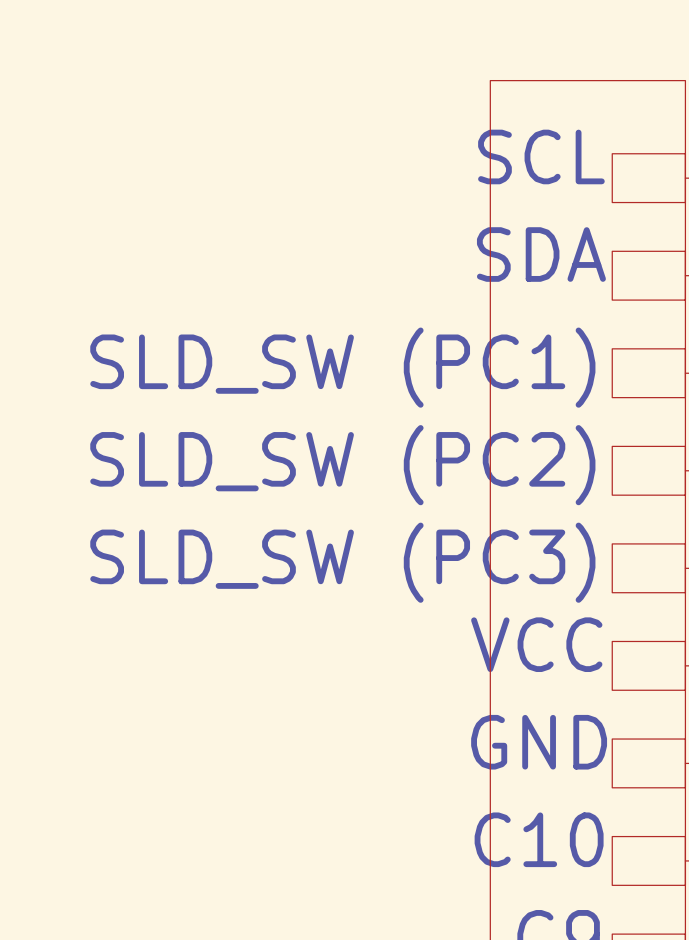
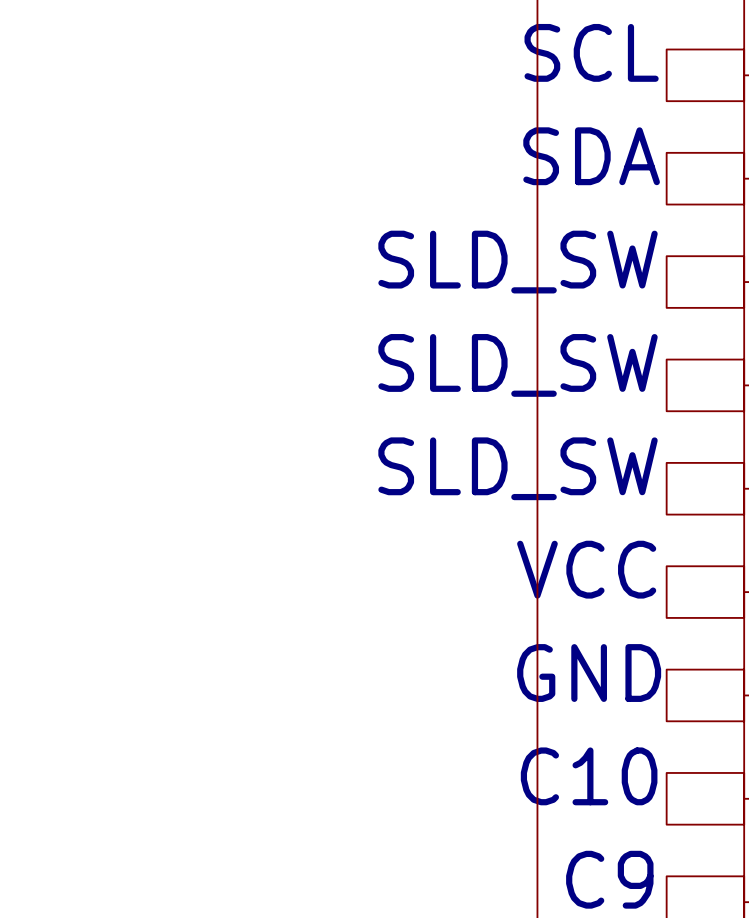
text: none -> SLD_SW (518, 262)
text: SLD_SW (PC1) (342, 367) -> none
text: none -> SLD_SW (518, 365)
text: SLD_SW (PC2) (342, 465) -> none
text: none -> SLD_SW (518, 468)
text: SLD_SW (PC3) (342, 562) -> none

